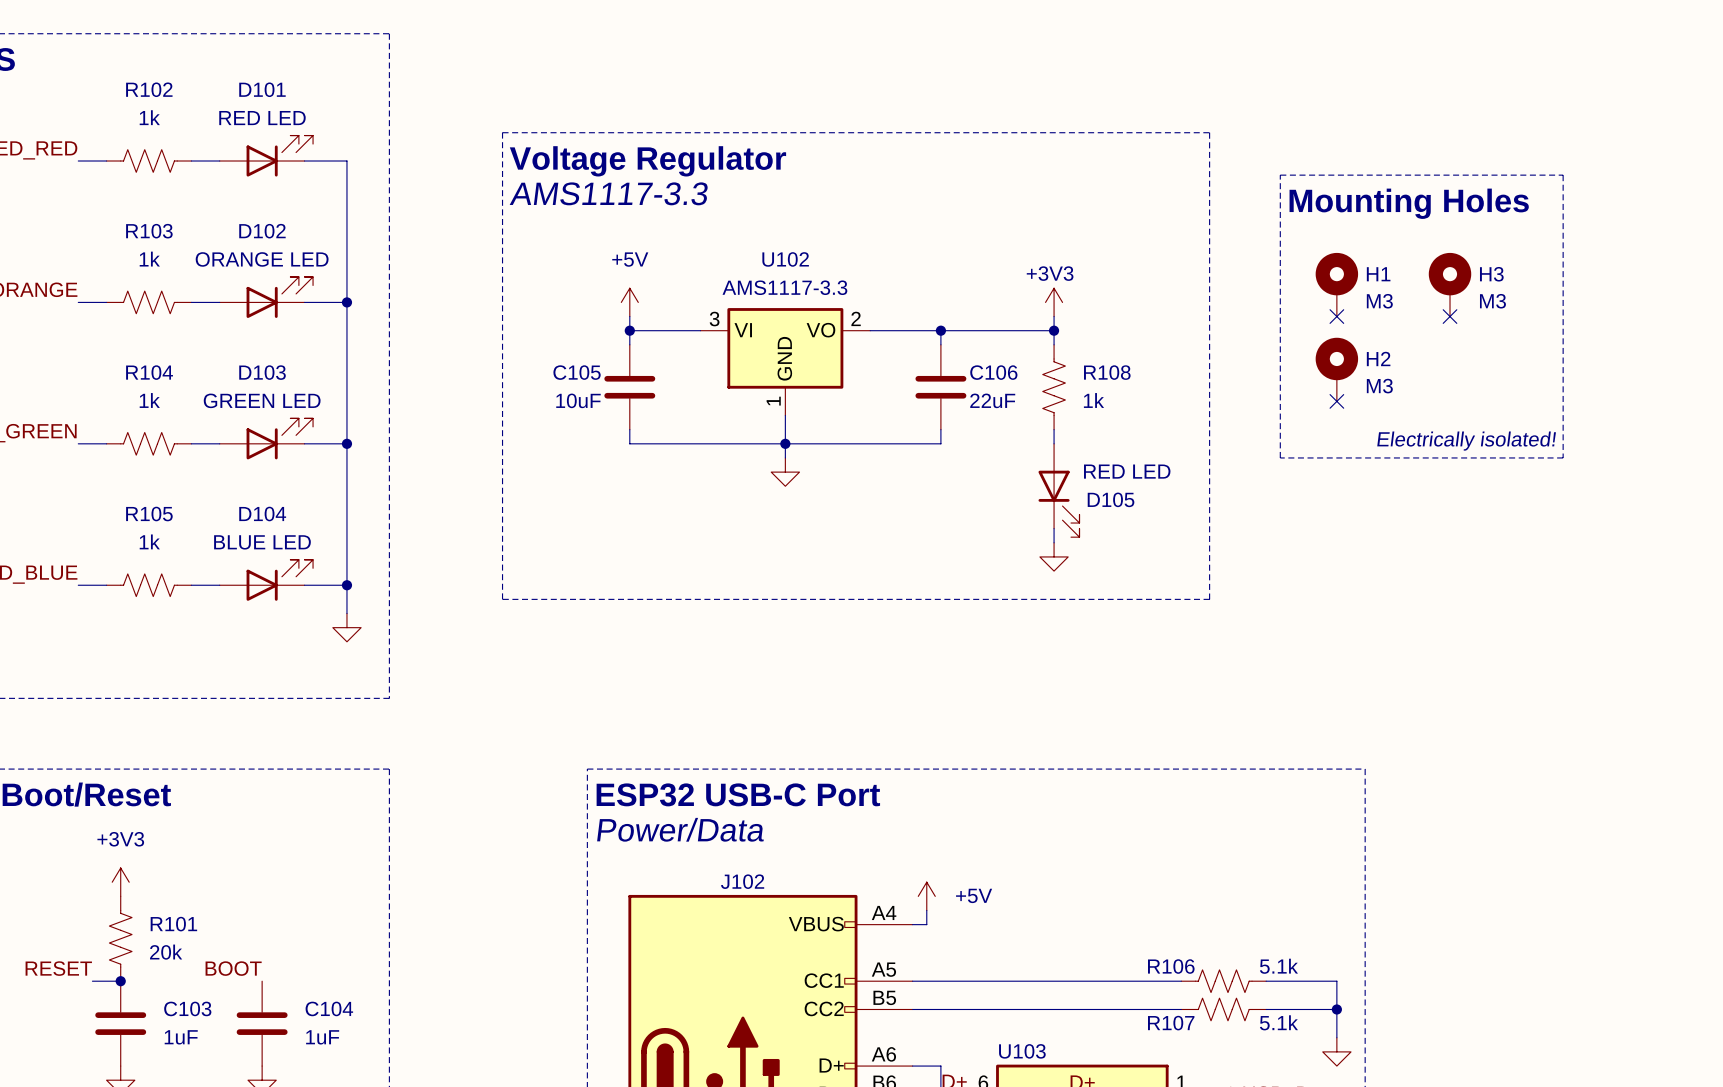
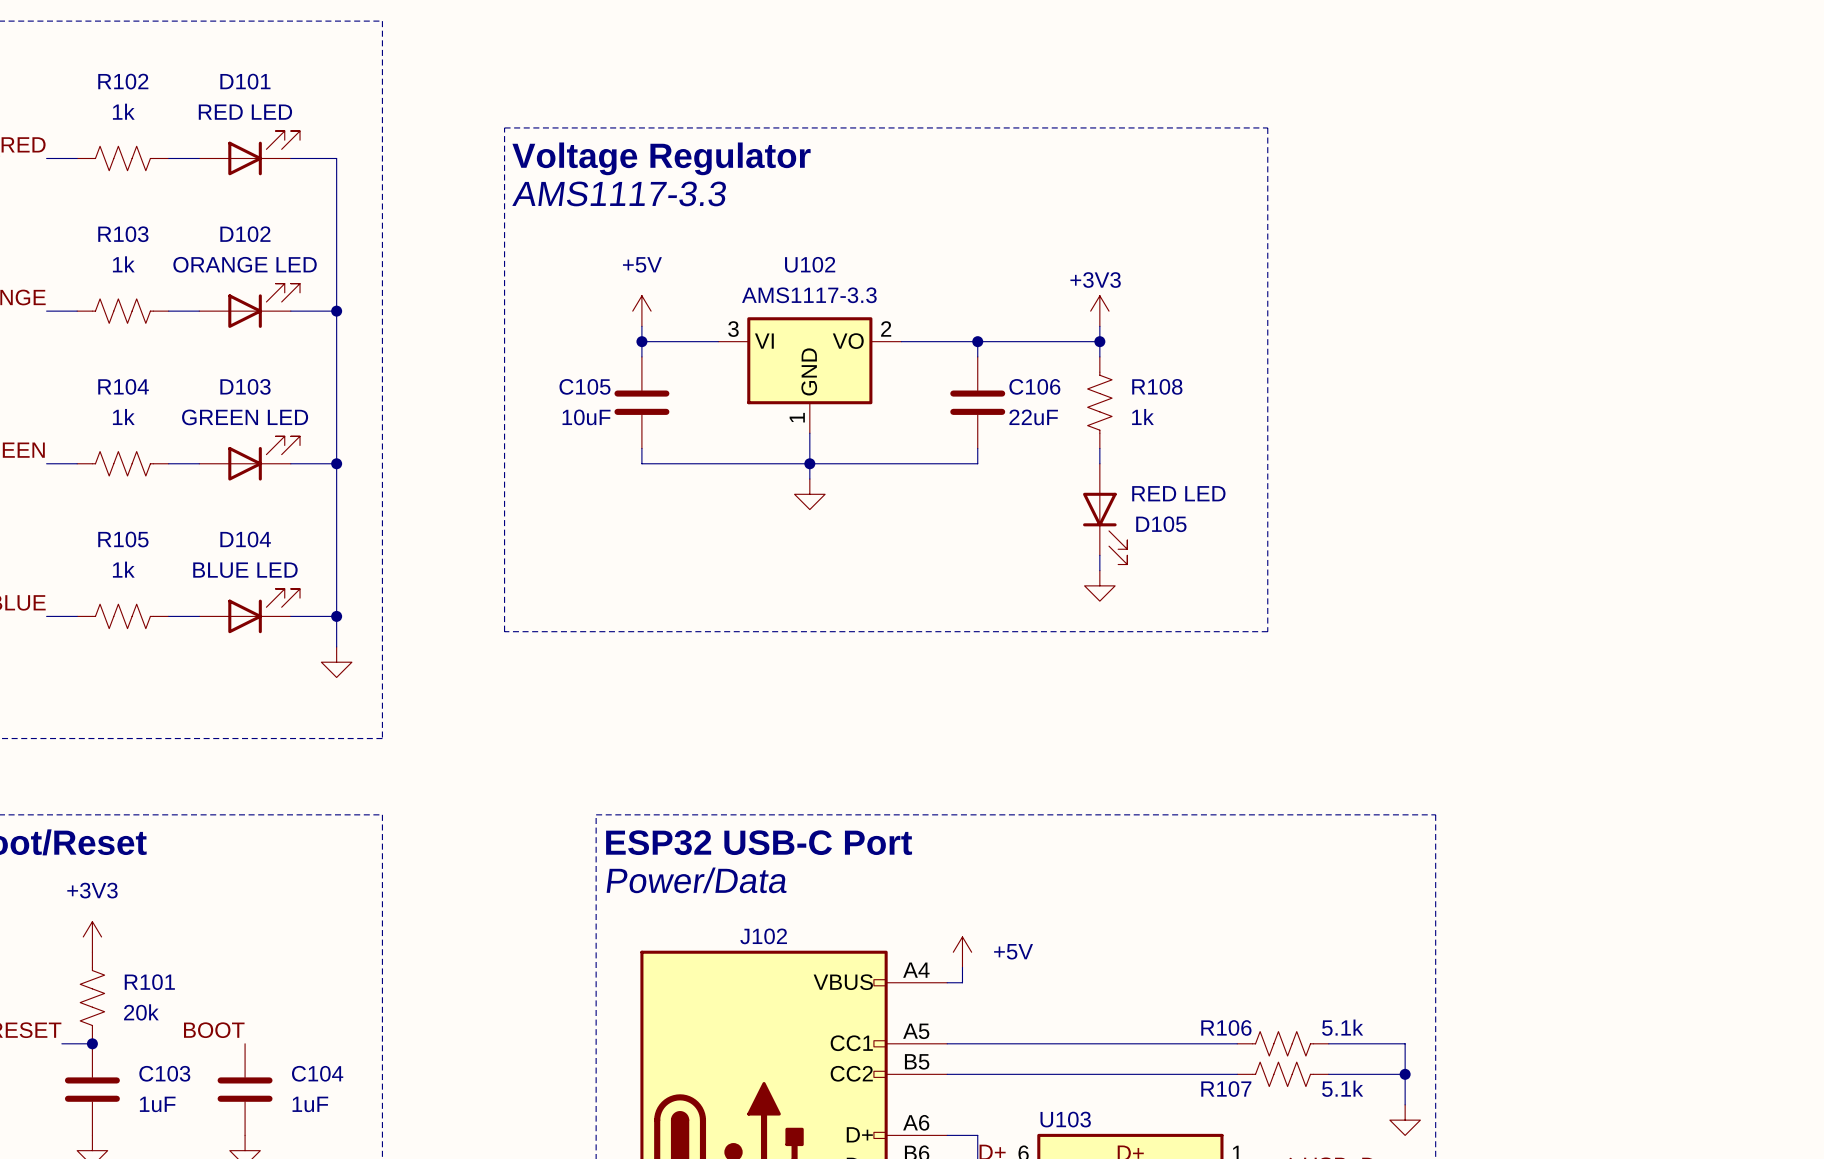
line: (1280, 175) (1563, 175) (1563, 457) (1280, 457) (1280, 175) -> none
text: Mounting Holes (1409, 203) -> none
H1: M3 (1336, 284) -> none
H3: M3 (1450, 284) -> none
no-connect mark: (1336, 316) -> none
no-connect mark: (1450, 316) -> none
H2: M3 (1336, 369) -> none
no-connect mark: (1336, 401) -> none
text: Electrically isolated! (1466, 441) -> none

